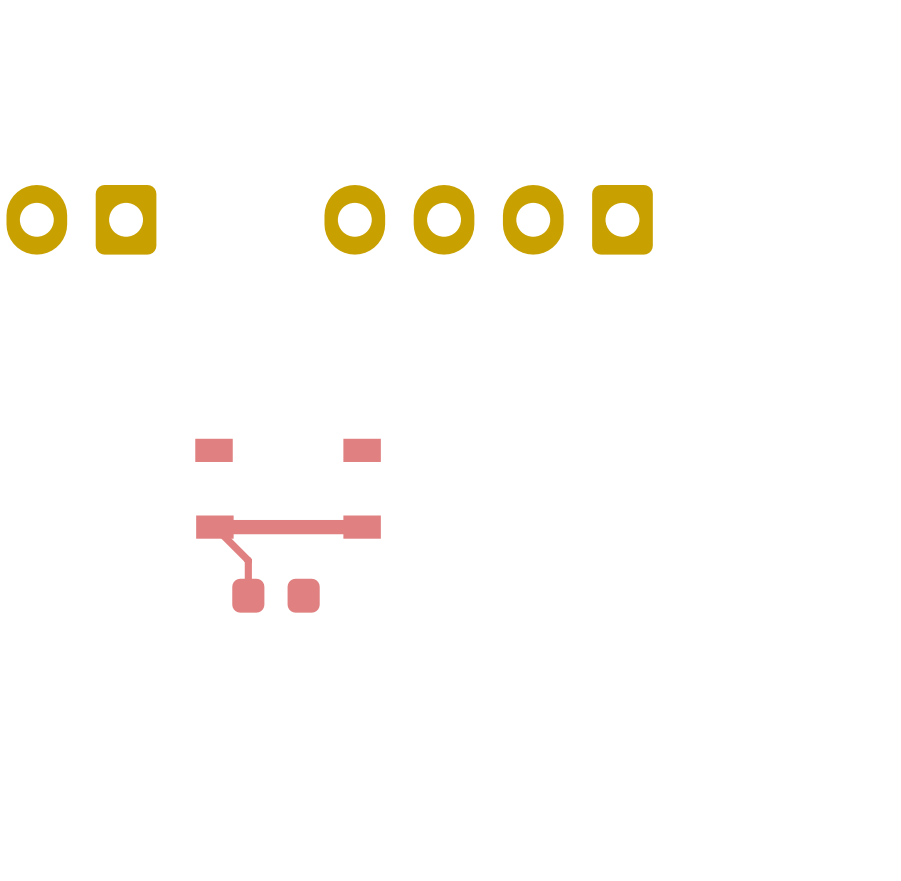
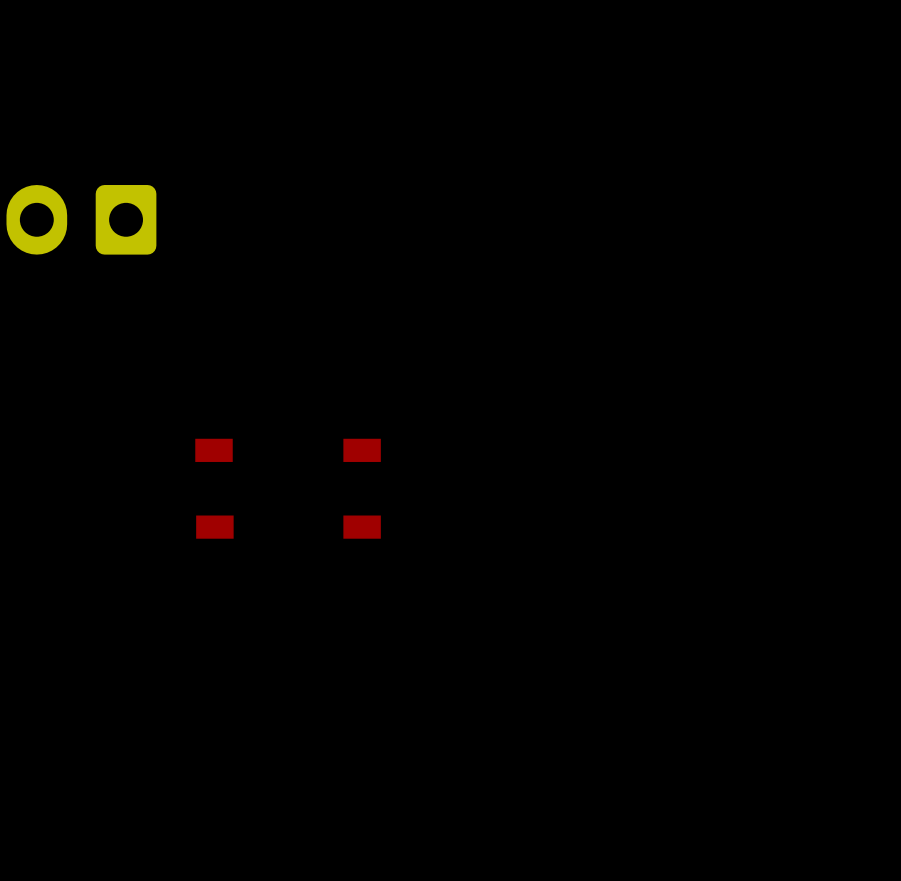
part: (488, 219) -> none
top track: (362, 527) (214, 527) (248, 560) (248, 595) -> none
part: (275, 595) -> none

